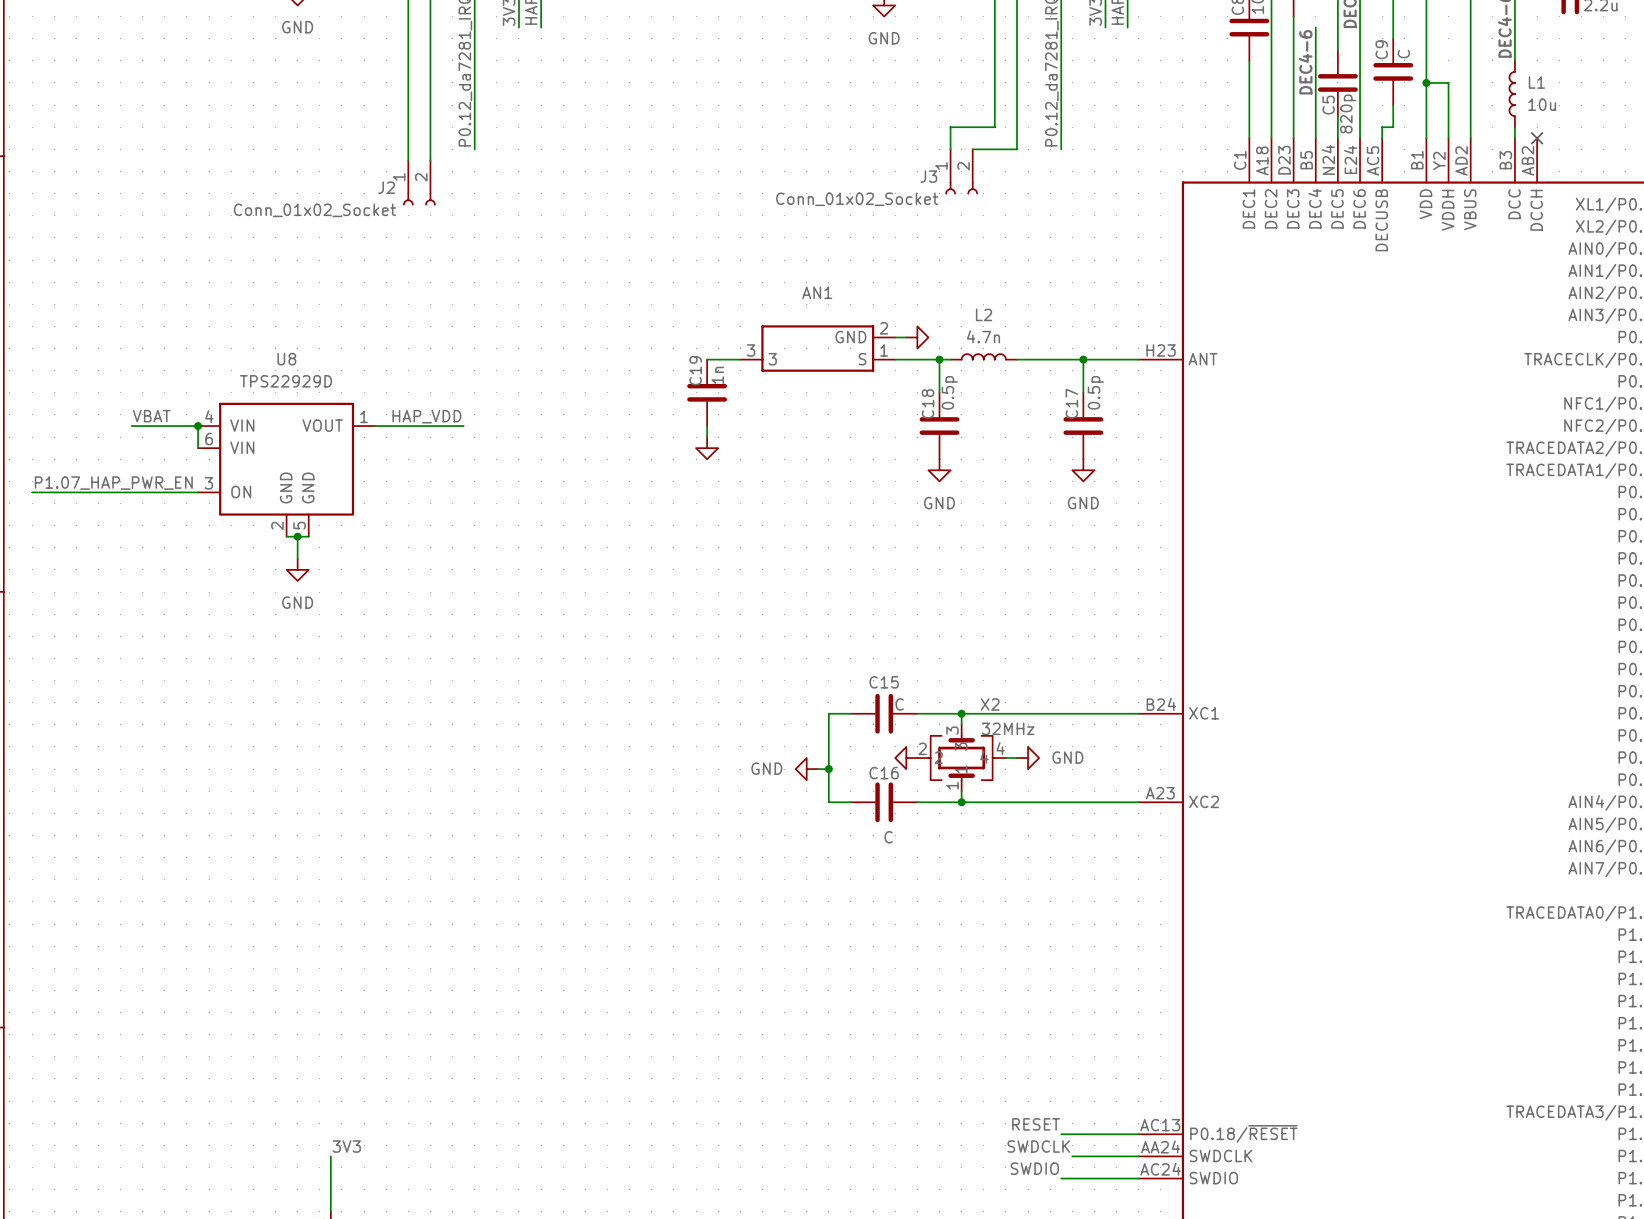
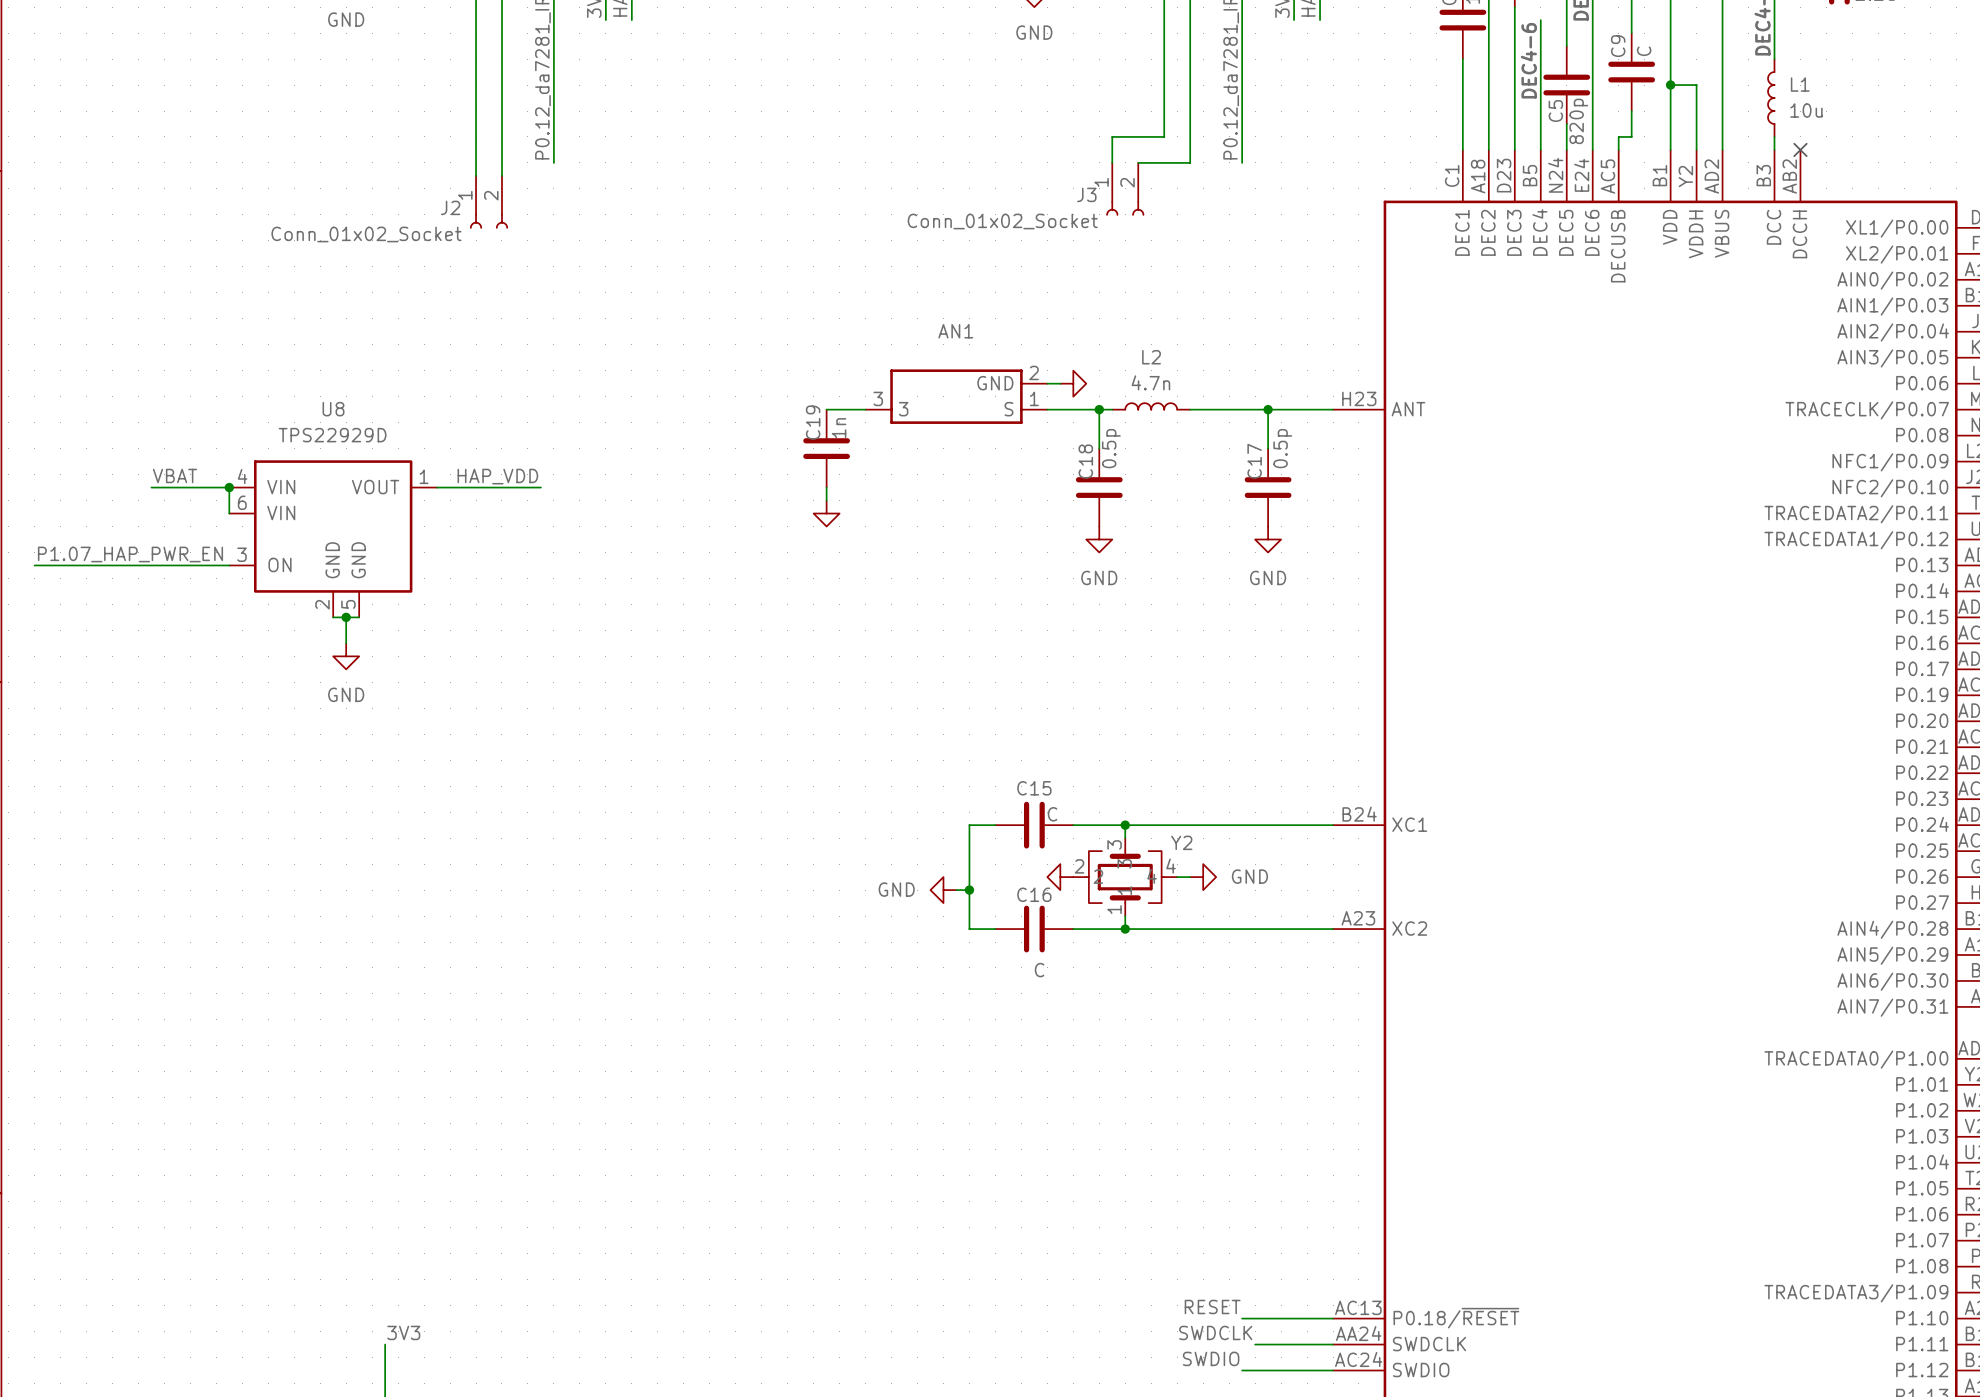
X2 name: X2 (990, 704) -> Y2 (1181, 842)
X2 value: 32MHz (1008, 728) -> none

